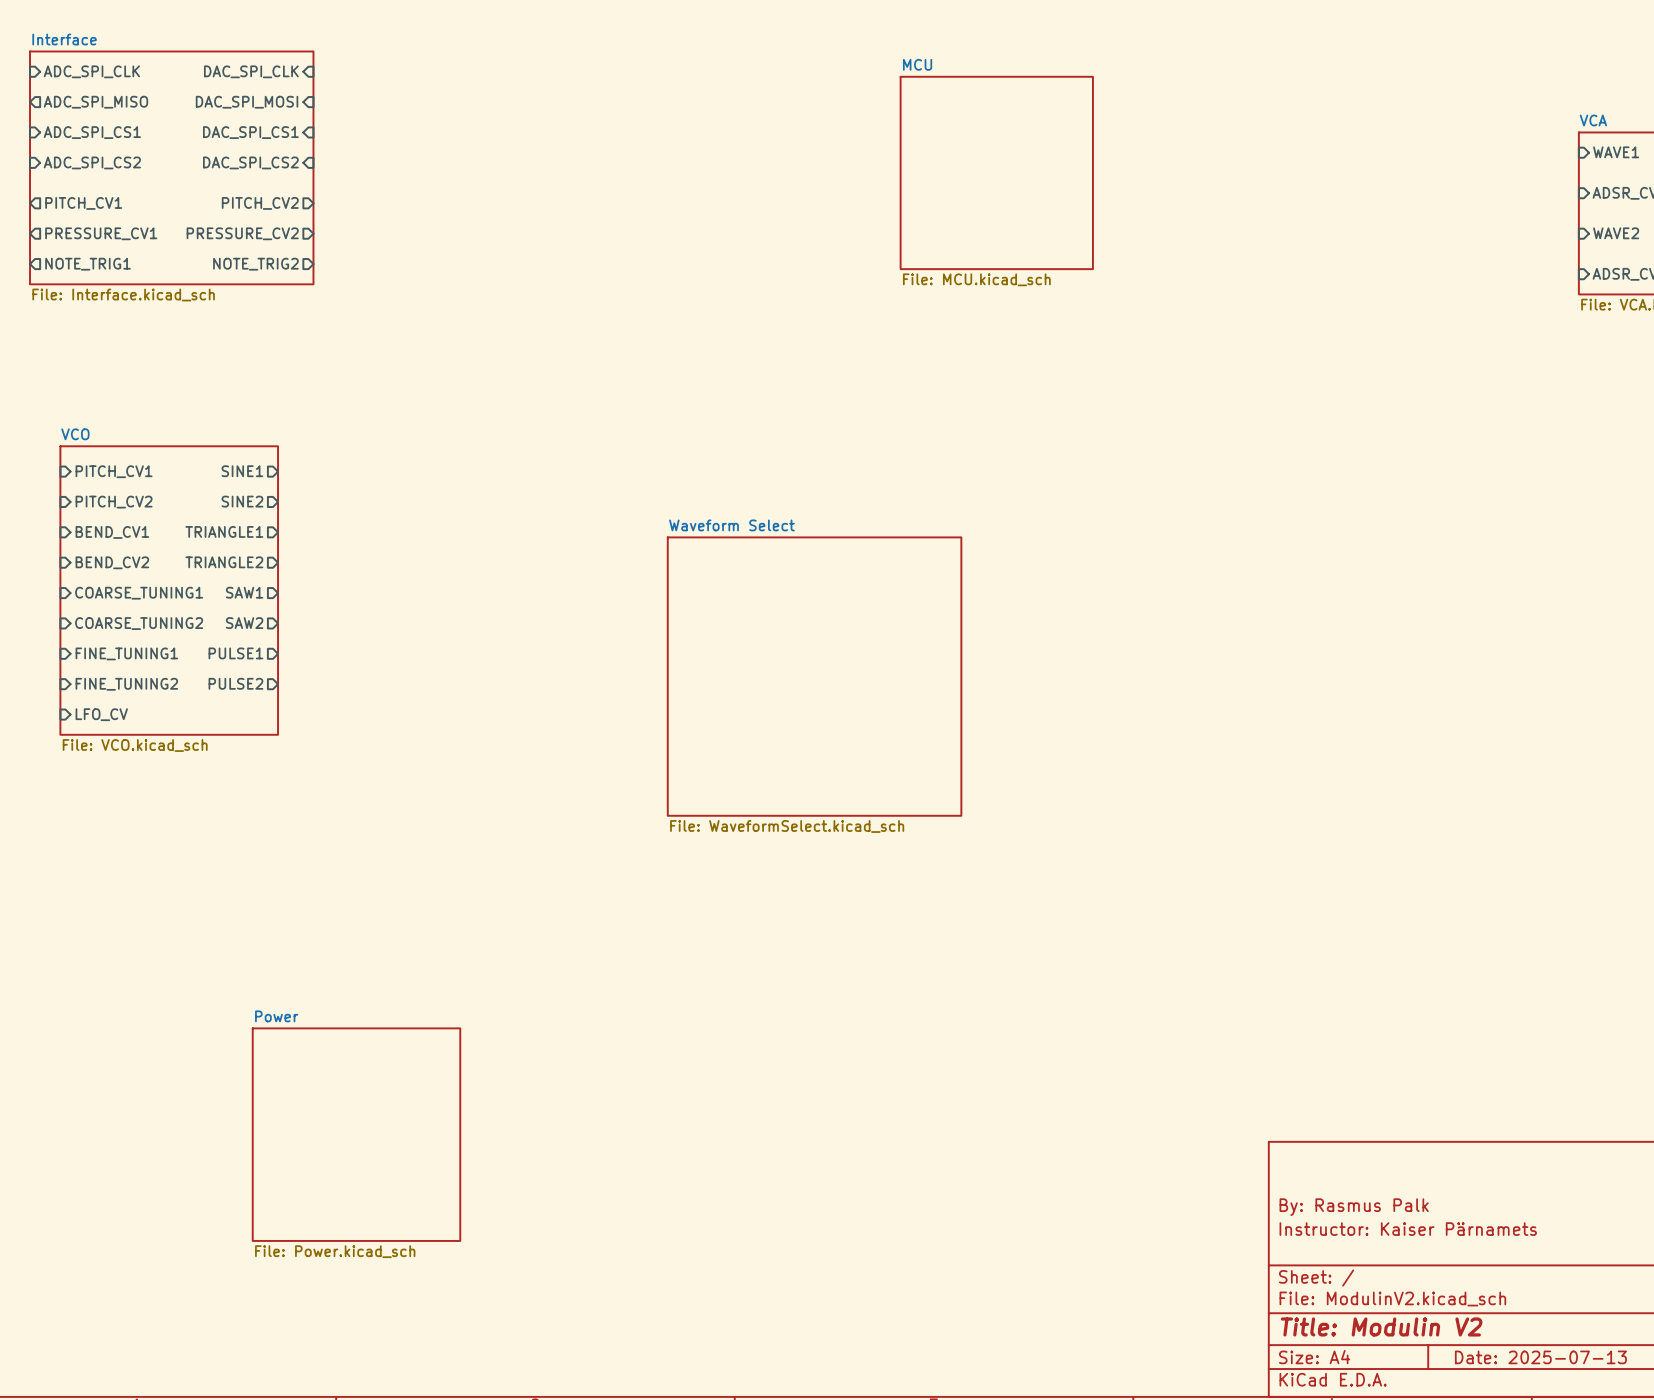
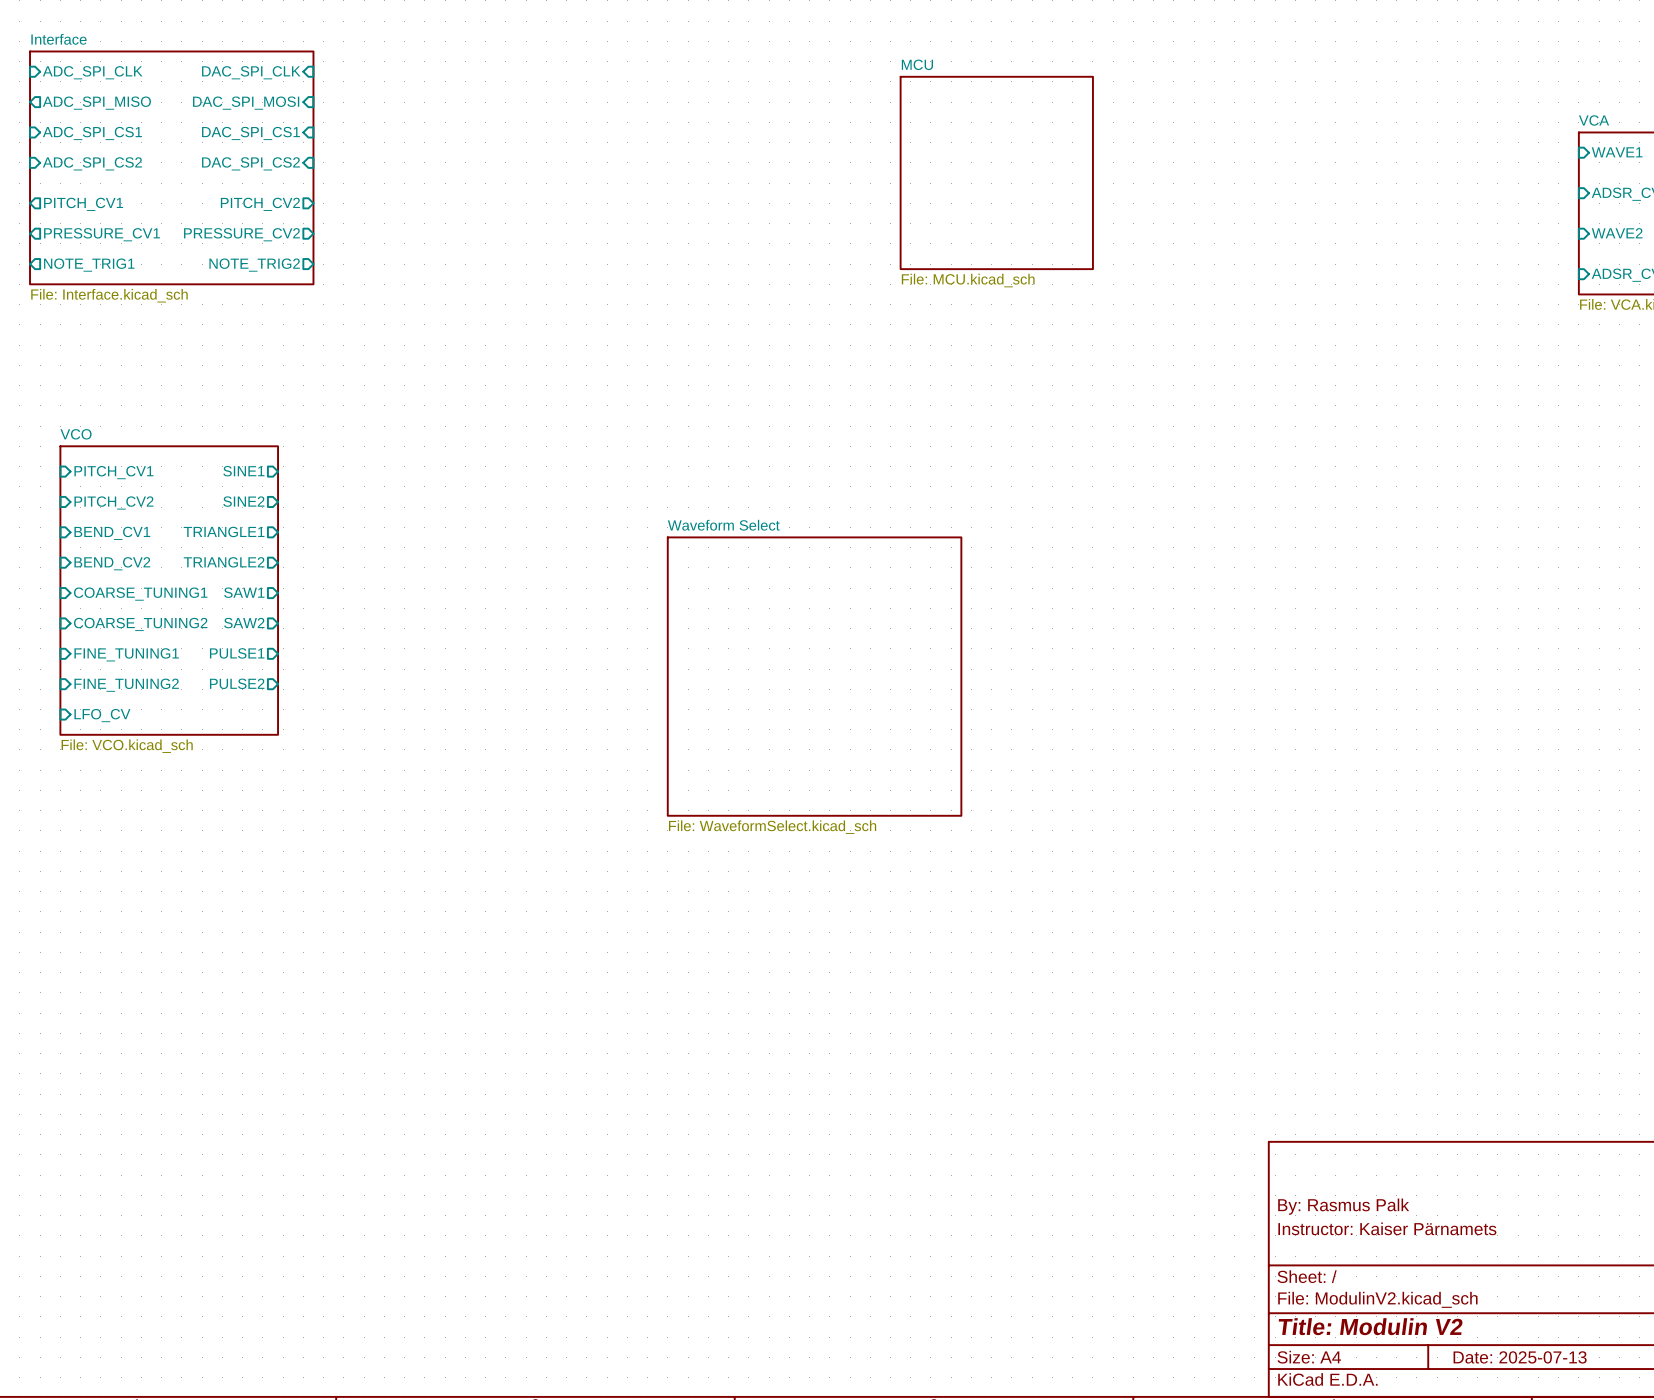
sheet Power: File: Power.kicad_sch (356, 1134) -> none

